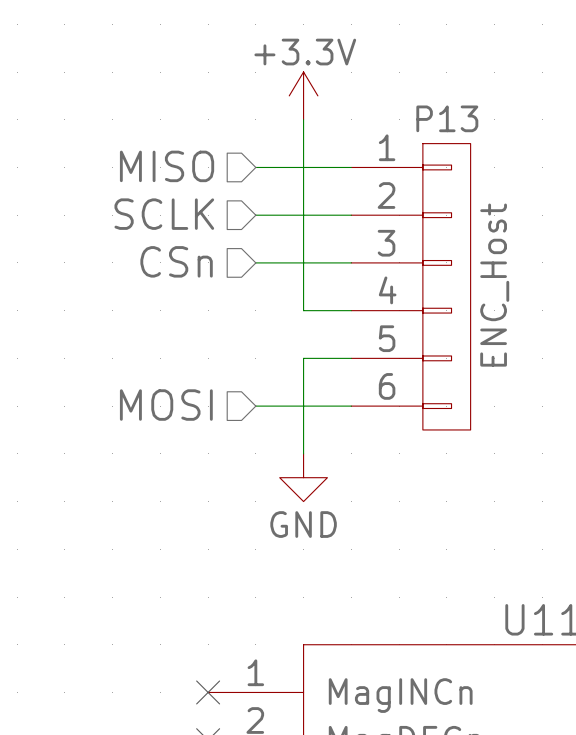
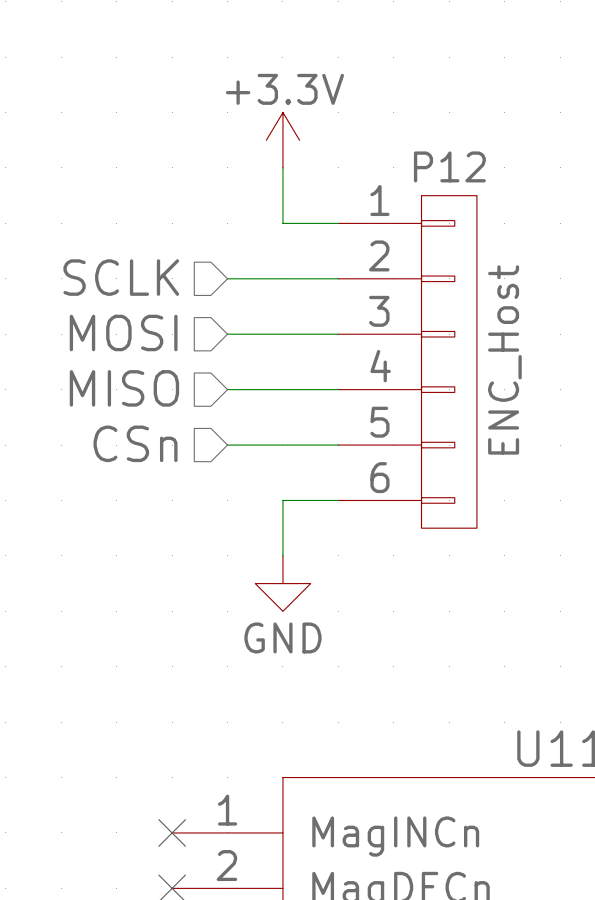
P13 name: P13 (447, 118) -> P12 (449, 166)
hierarchical label position: MISO (167, 166) -> MISO (124, 388)
wire: (255, 167) (303, 167) (303, 310) -> (227, 389) (282, 389)
hierarchical label: CSn (176, 261) -> MOSI (123, 332)
hierarchical label: none -> CSn (135, 443)
wire: (303, 358) (303, 406) (255, 406) -> (282, 445) (227, 445)
hierarchical label: MOSI (166, 405) -> none

